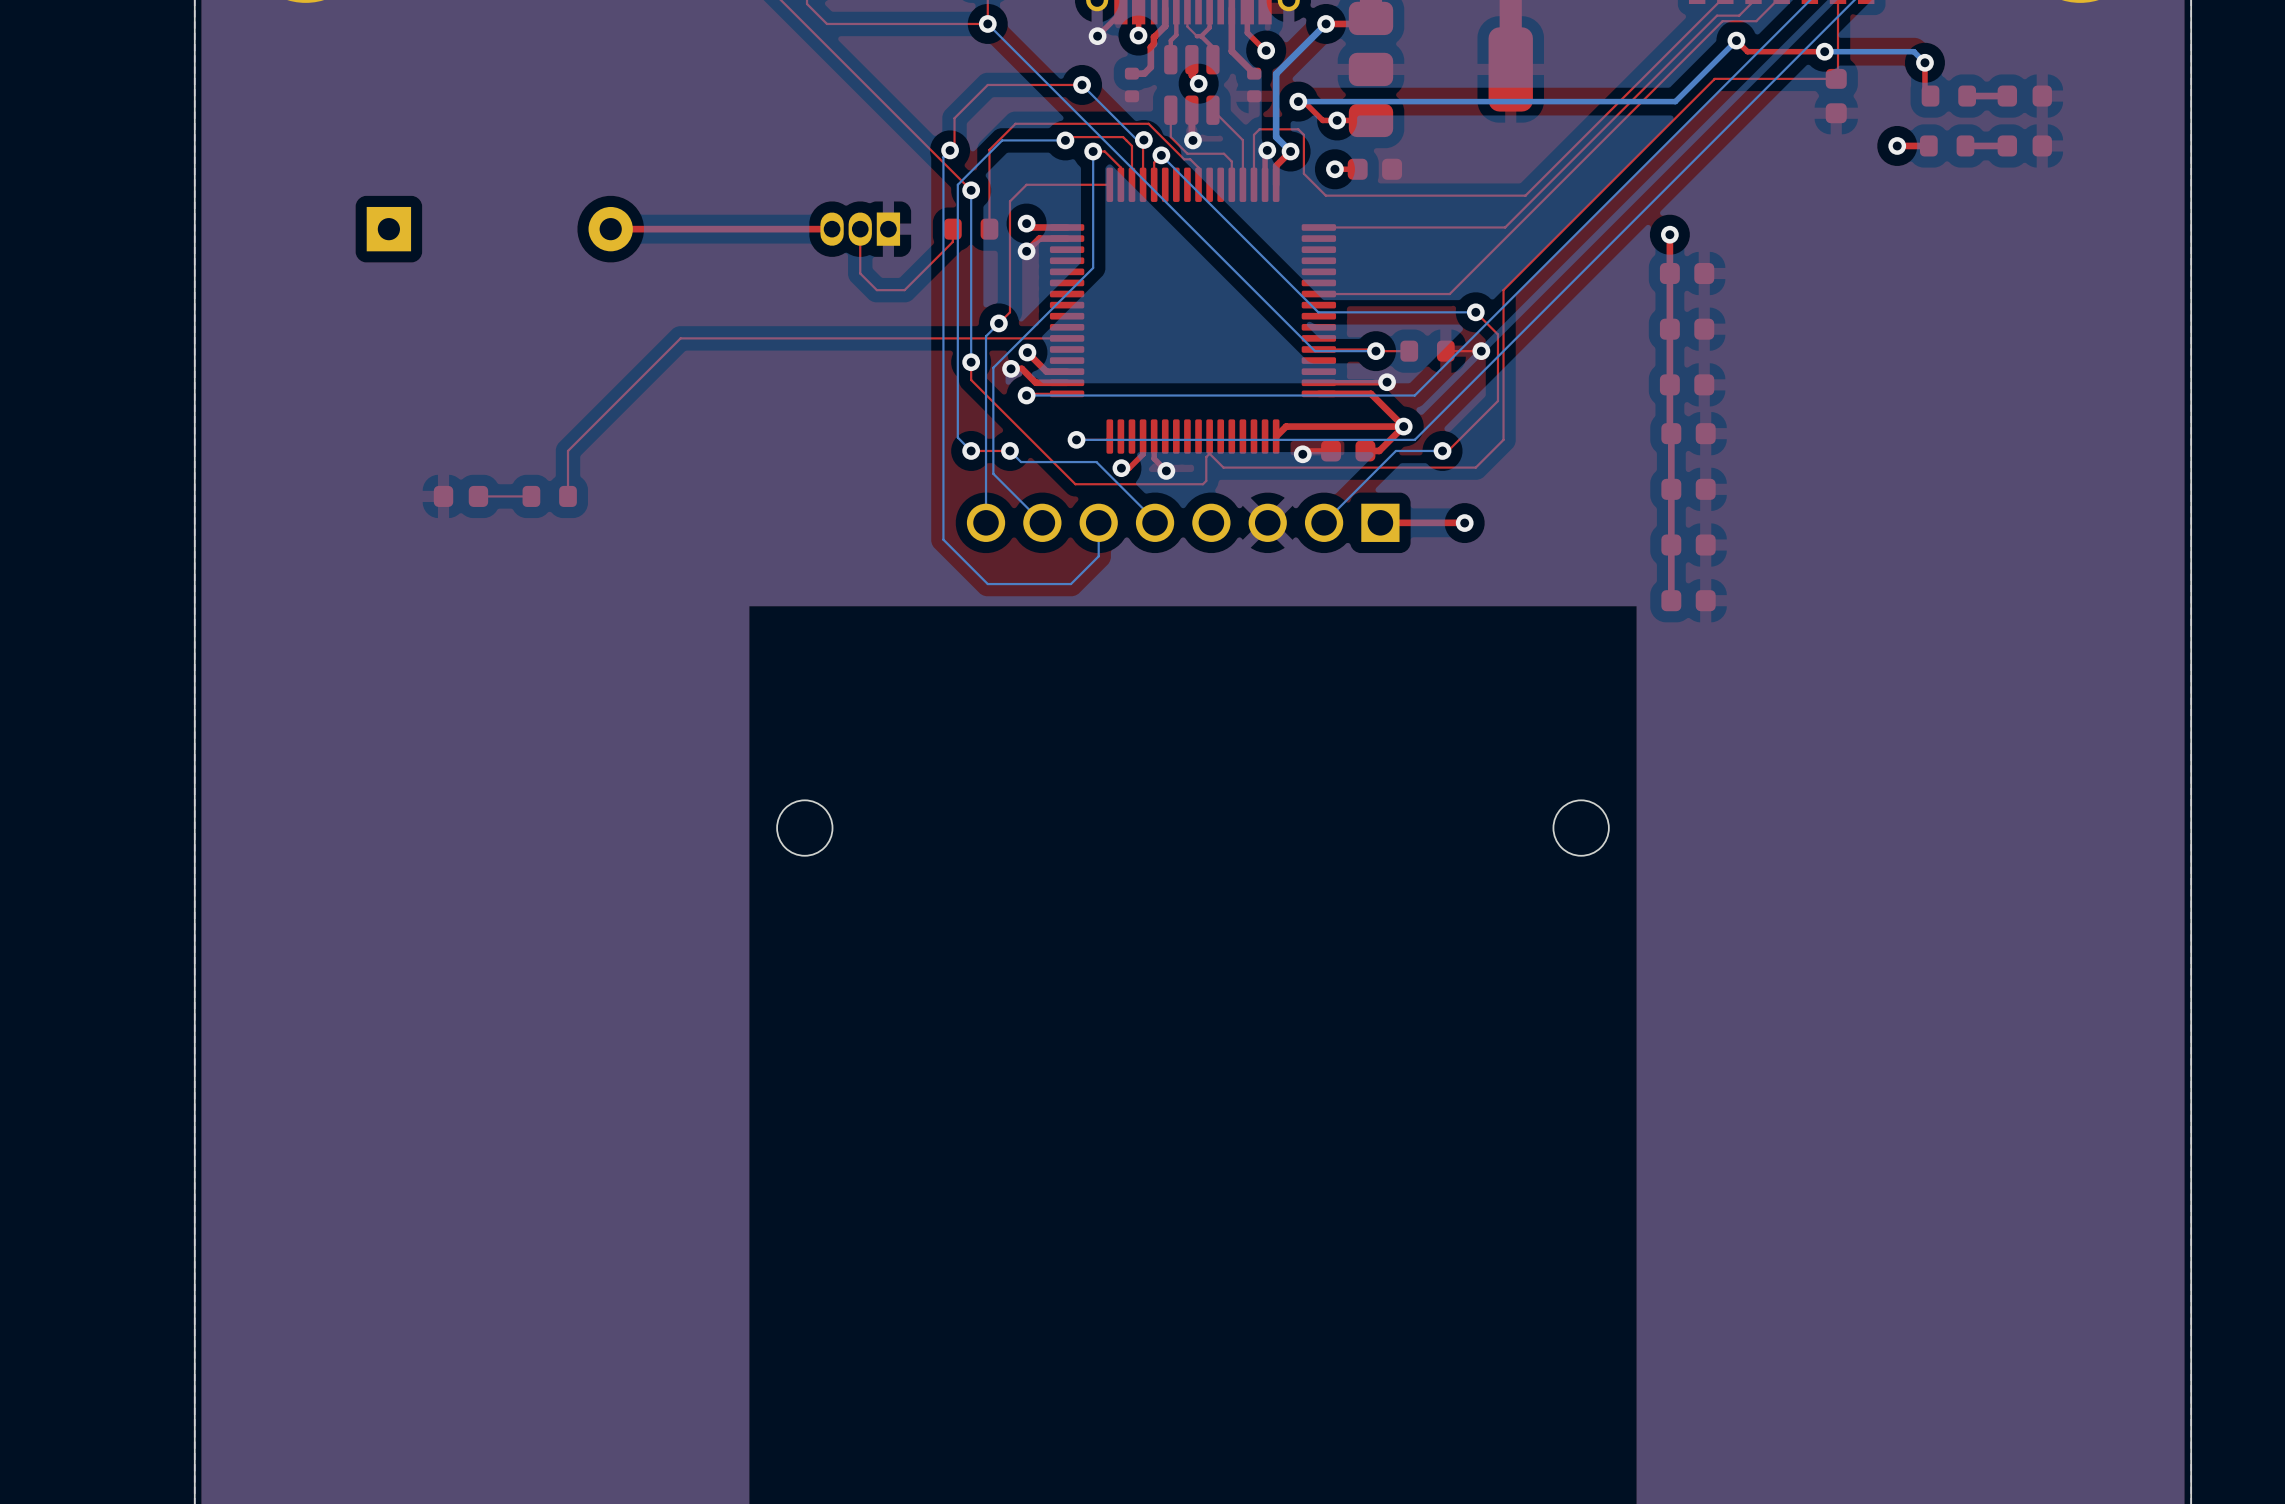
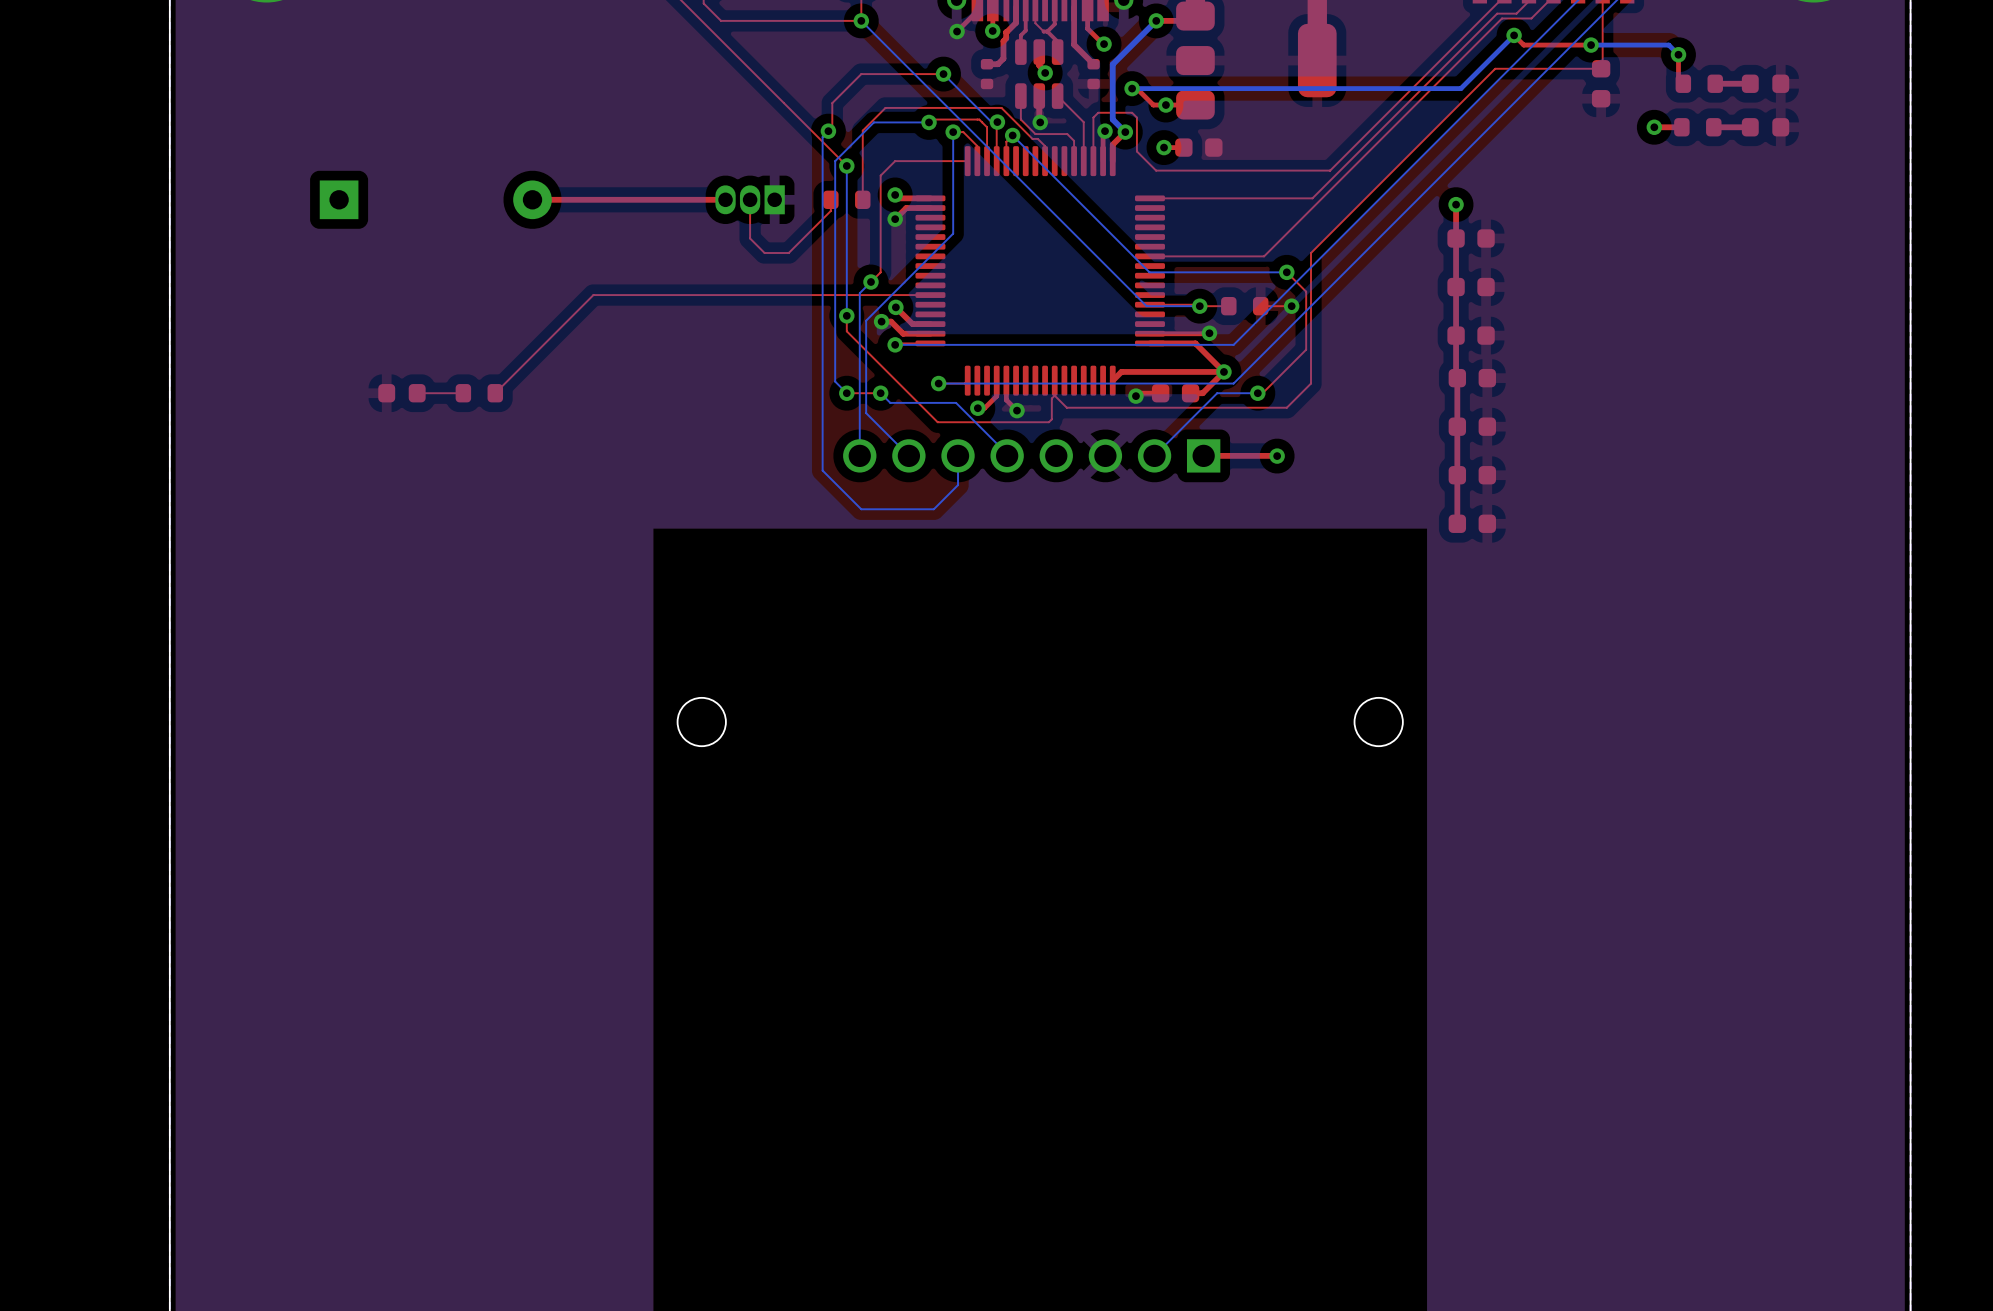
top track: (568, 450) (568, 496) -> none
part position: (460, 496) -> (401, 393)
top track: (531, 496) (478, 496) -> (463, 393) (417, 393)
part position: (549, 496) -> (479, 393)

